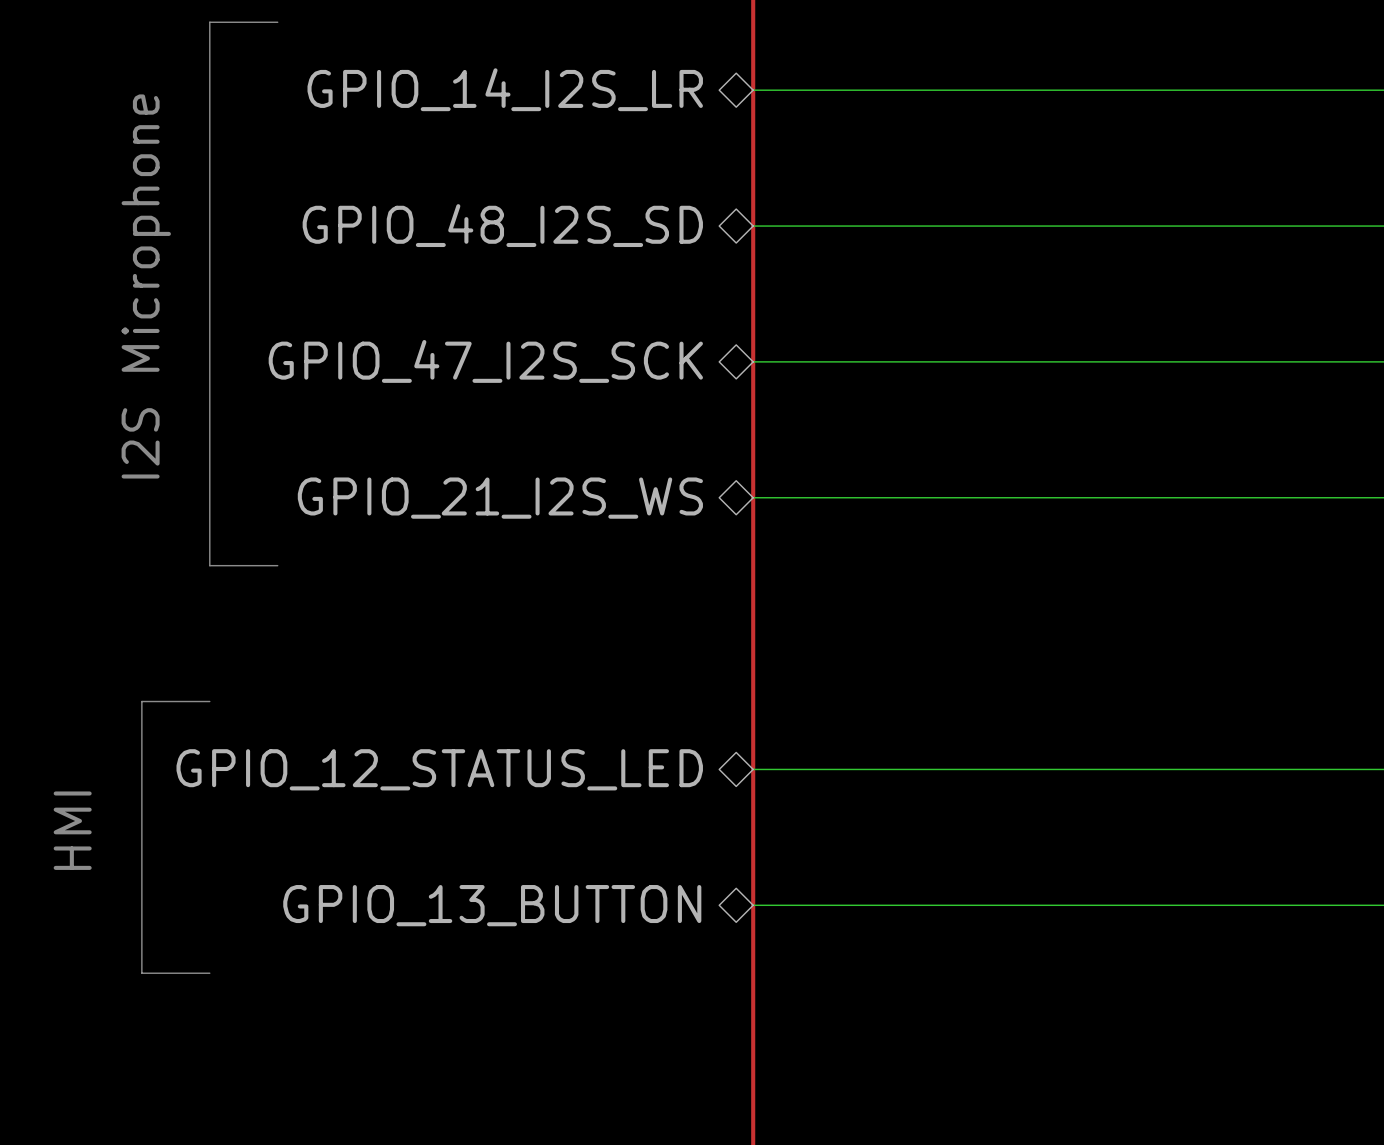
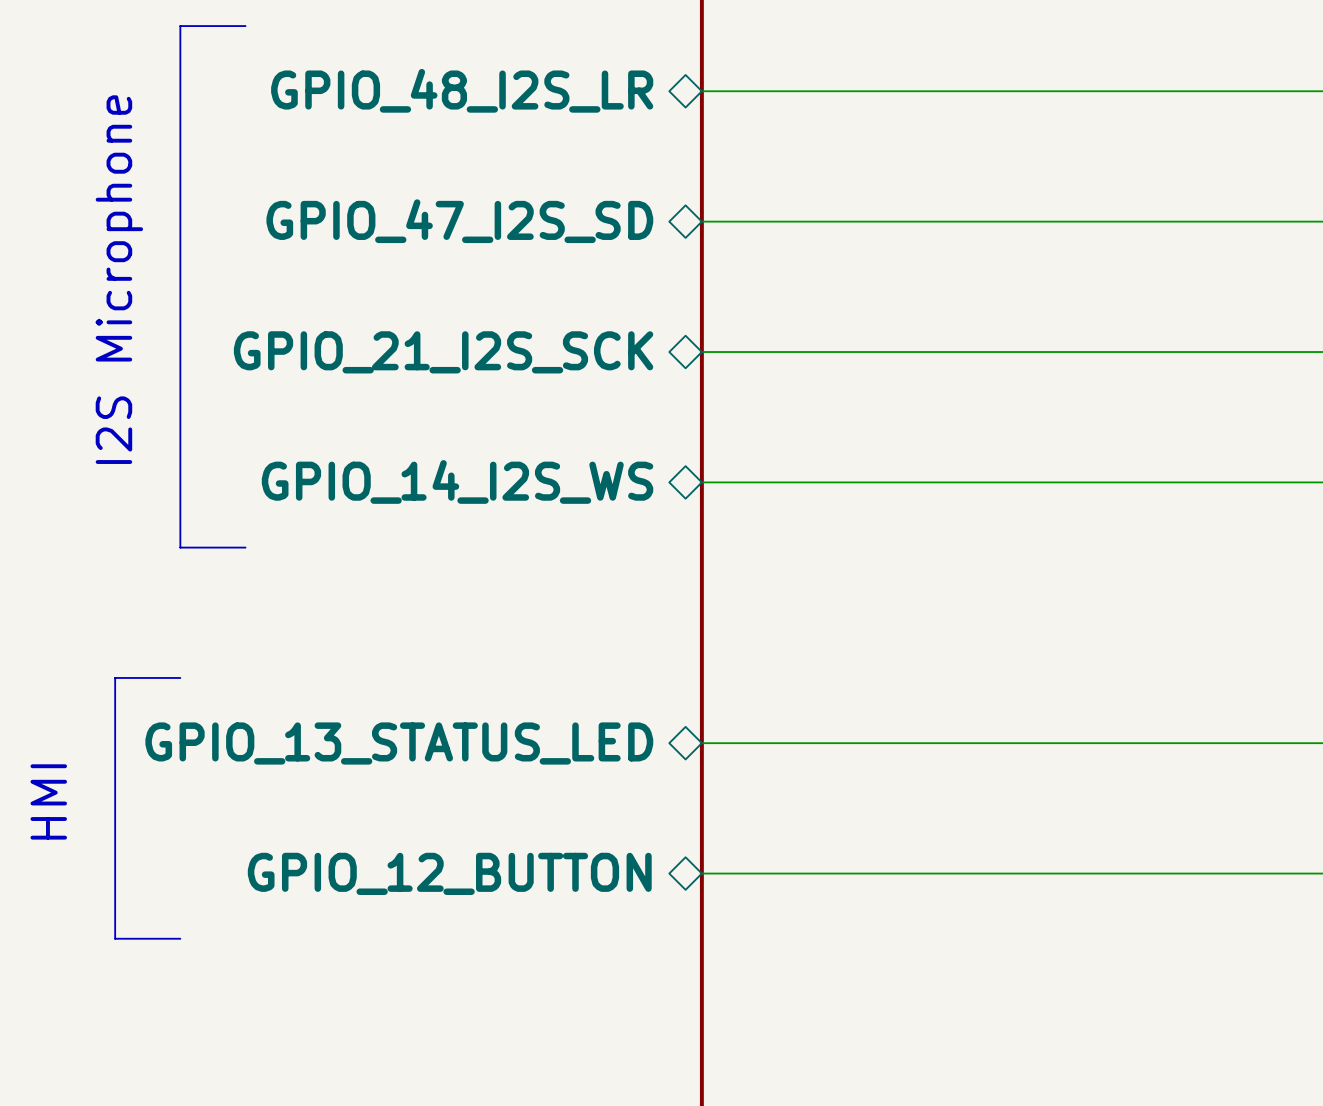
sheet pin: GPIO_14_I2S_LR (505, 89) -> GPIO_48_I2S_LR (462, 90)
sheet pin: GPIO_48_I2S_SD (502, 225) -> GPIO_47_I2S_SD (459, 221)
sheet pin: GPIO_47_I2S_SCK (485, 361) -> GPIO_21_I2S_SCK (443, 352)
sheet pin: GPIO_21_I2S_WS (500, 498) -> GPIO_14_I2S_WS (457, 481)
sheet pin: GPIO_12_STATUS_LED (439, 769) -> GPIO_13_STATUS_LED (399, 743)
sheet pin: GPIO_13_BUTTON (492, 905) -> GPIO_12_BUTTON (449, 873)

